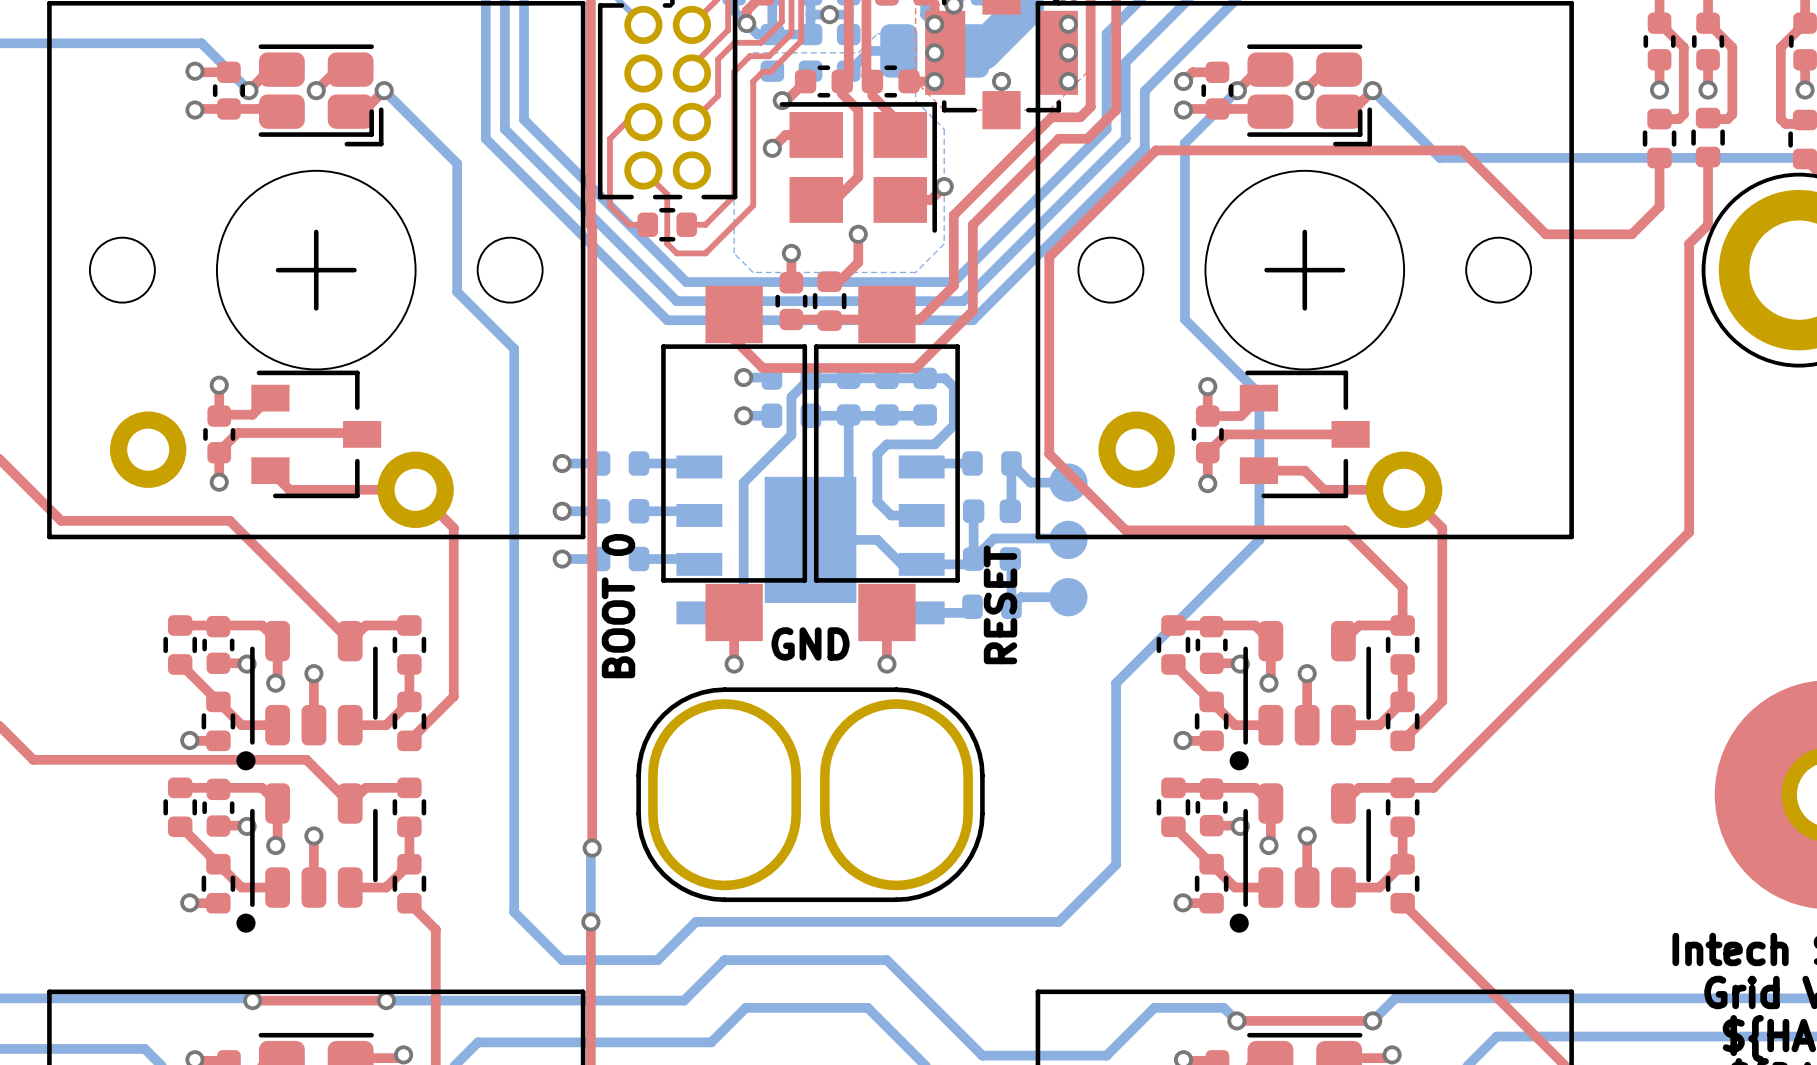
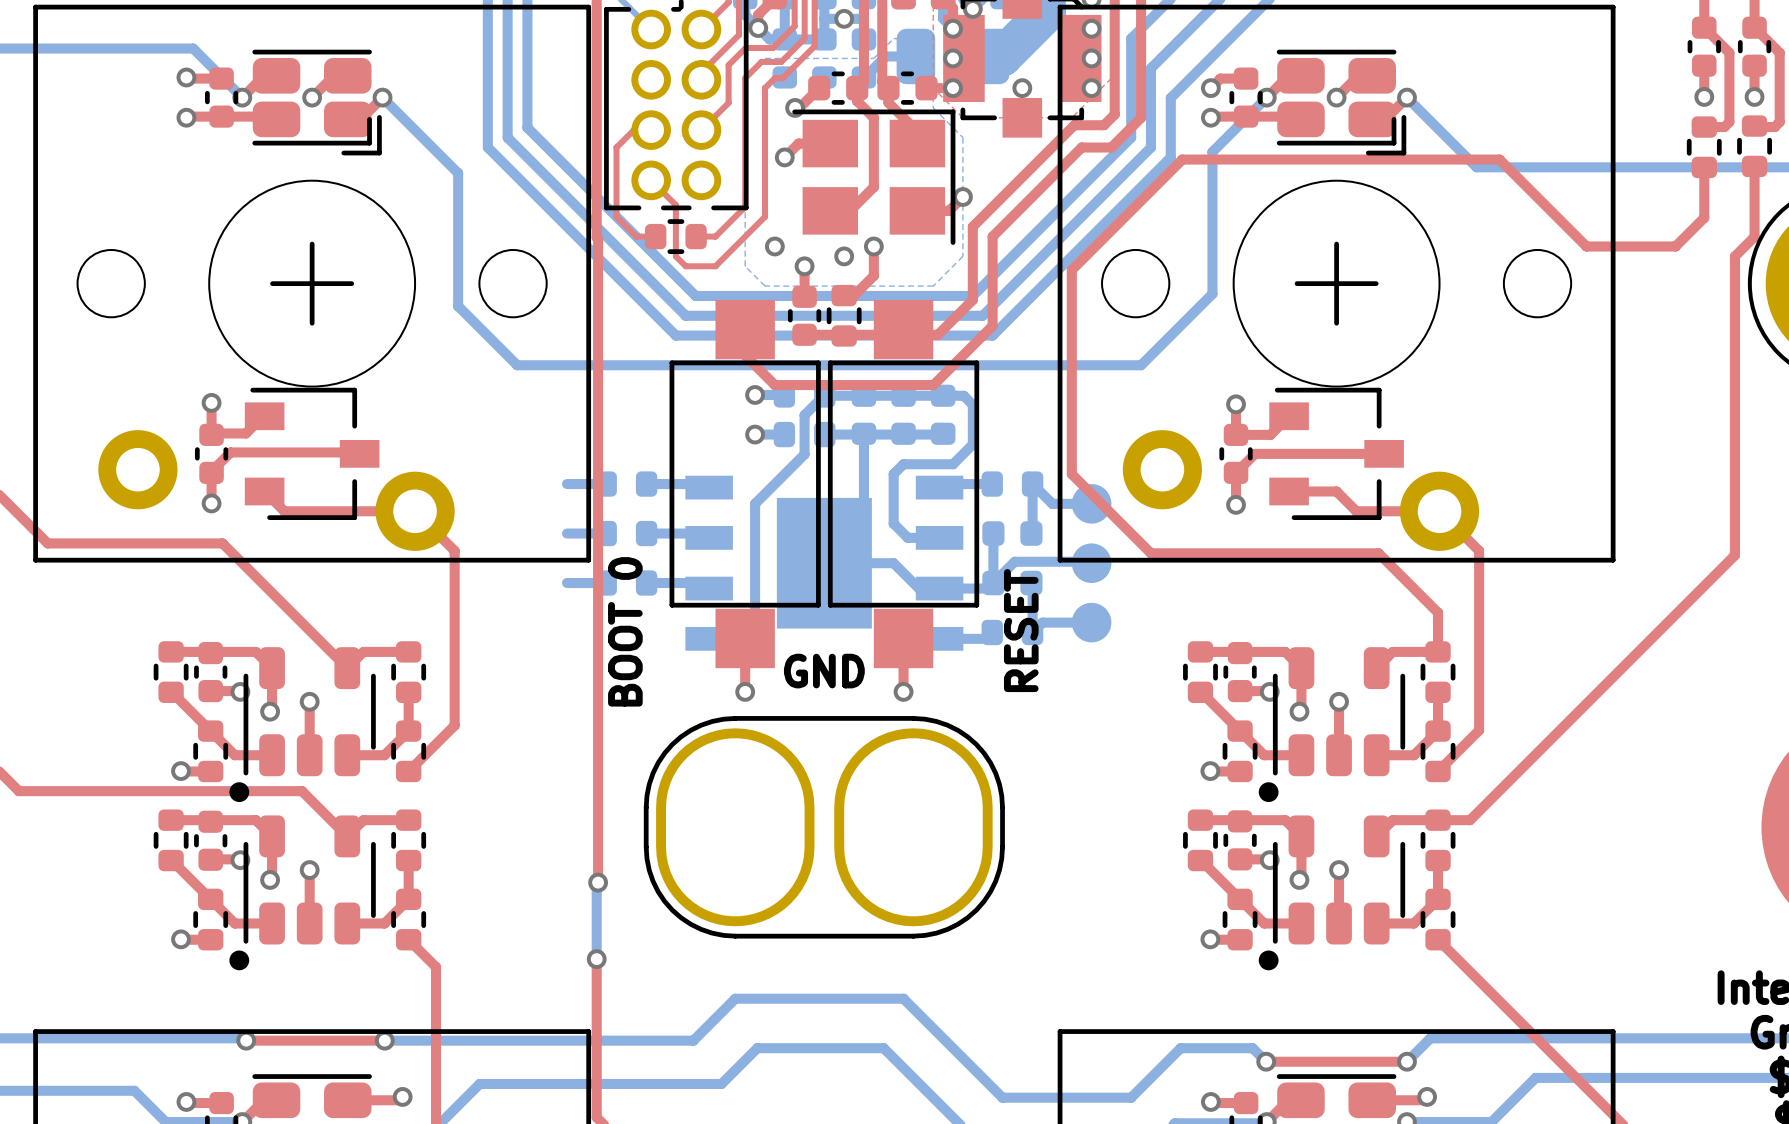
via: none -> (774, 246)
via: none -> (844, 256)
bottom track: (1185, 280) (1185, 319) (1259, 393) (1259, 539) (1116, 683) (1116, 864) (1058, 921) (695, 921) (657, 960) (562, 960) (514, 912) (514, 348) -> (1212, 293) (1141, 365) (517, 365)
via: (562, 463) -> none
via: (562, 511) -> none
via: (562, 559) -> none

